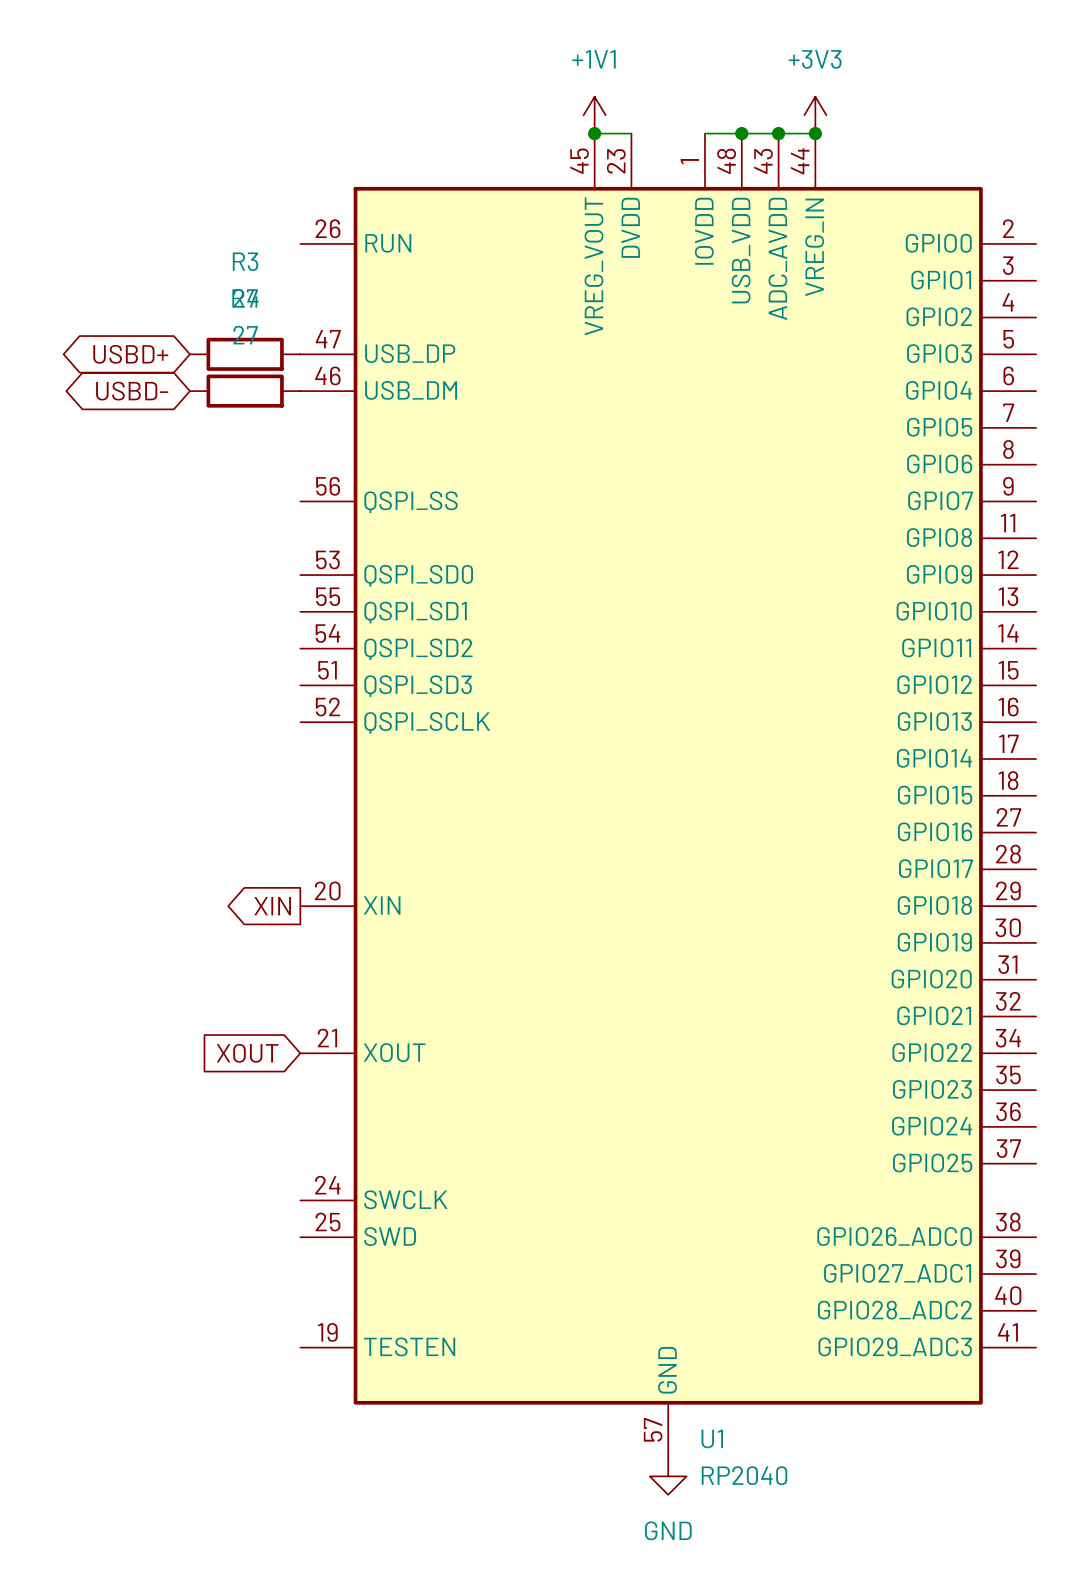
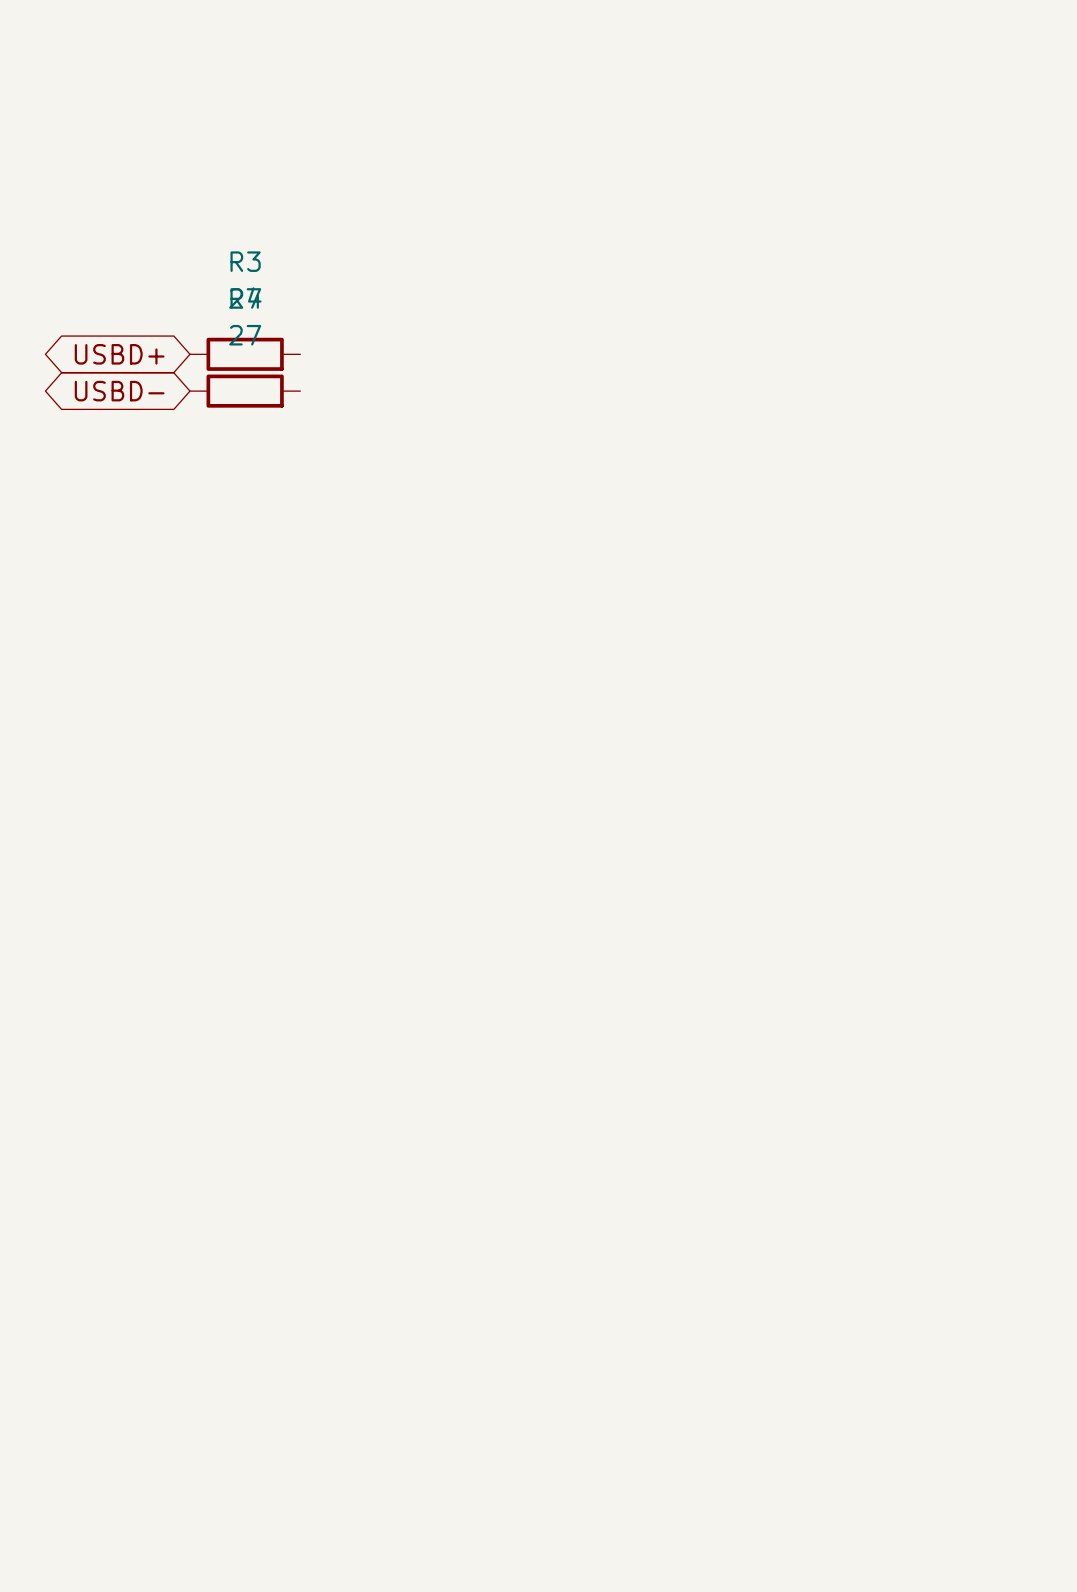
power symbol: +1V1 (594, 115) -> none
power symbol: +3V3 (815, 115) -> none
wire: (594, 133) (631, 133) -> none
junction: (594, 133) -> none
wire: (705, 133) (815, 133) -> none
junction: (741, 133) -> none
junction: (778, 133) -> none
junction: (815, 133) -> none
U1: RP2040 (668, 795) -> none
global label: XIN (272, 906) -> none
global label: XOUT (247, 1053) -> none
power symbol: GND (668, 1476) -> none

